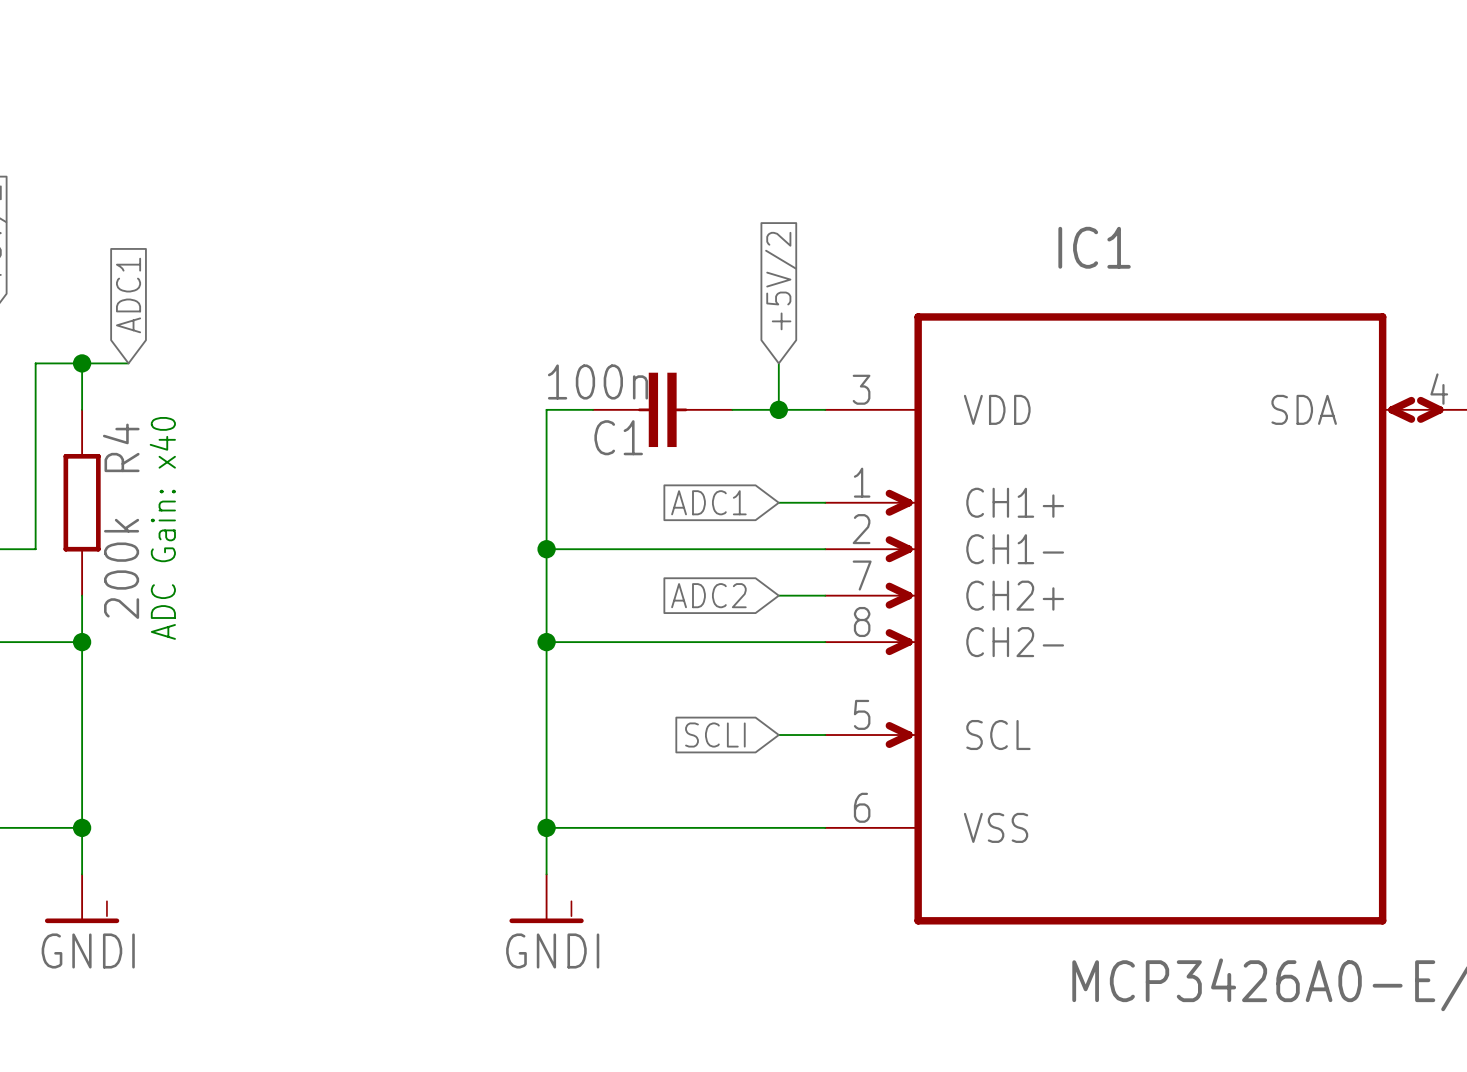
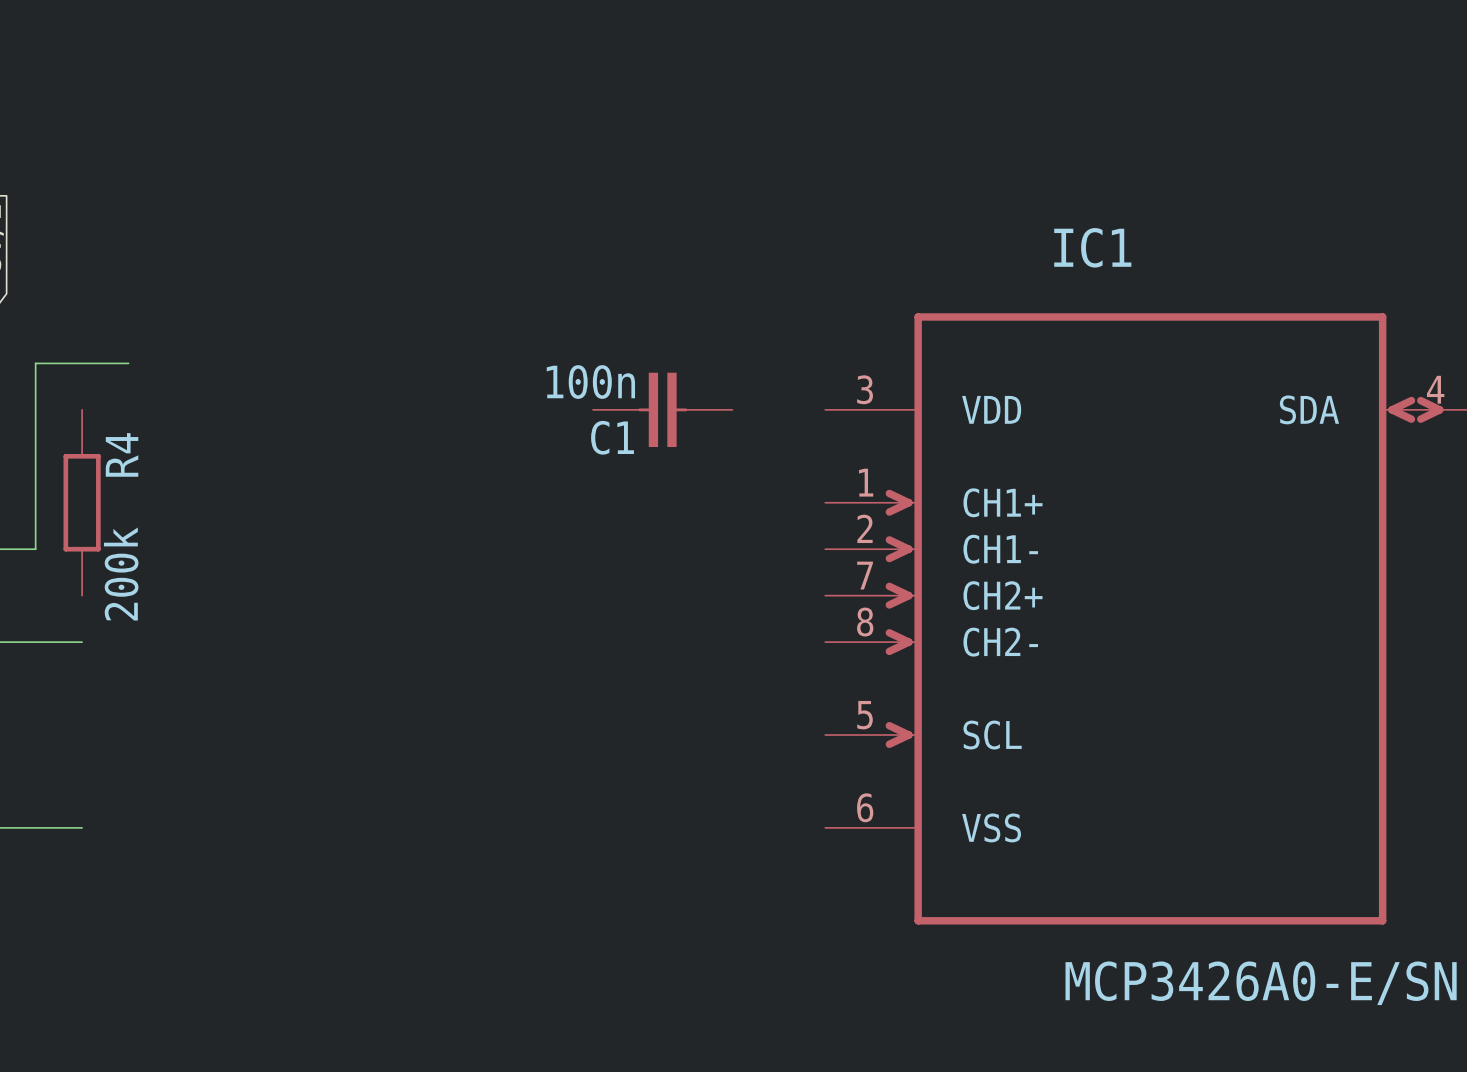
global label: +5V/2 (781, 281) -> none
global label: ADC1 (128, 295) -> none
wire: (82, 363) (82, 409) -> none
junction: (82, 363) -> none
wire: (778, 363) (778, 409) -> none
wire: (593, 409) (546, 409) (546, 874) -> none
wire: (732, 409) (825, 409) -> none
junction: (778, 409) -> none
global label: ADC1 (708, 502) -> none
wire: (778, 502) (825, 502) -> none
text: ADC Gain: x40 (162, 528) -> none
wire: (546, 549) (825, 549) -> none
junction: (546, 549) -> none
wire: (82, 595) (82, 874) -> none
global label: ADC2 (708, 595) -> none
wire: (778, 595) (825, 595) -> none
junction: (82, 642) -> none
wire: (546, 642) (825, 642) -> none
junction: (546, 642) -> none
global label: SCLI (715, 735) -> none
wire: (778, 735) (825, 735) -> none
junction: (82, 827) -> none
wire: (546, 827) (825, 827) -> none
junction: (546, 827) -> none
power symbol: GNDI (82, 898) -> none
power symbol: GNDI (546, 898) -> none

